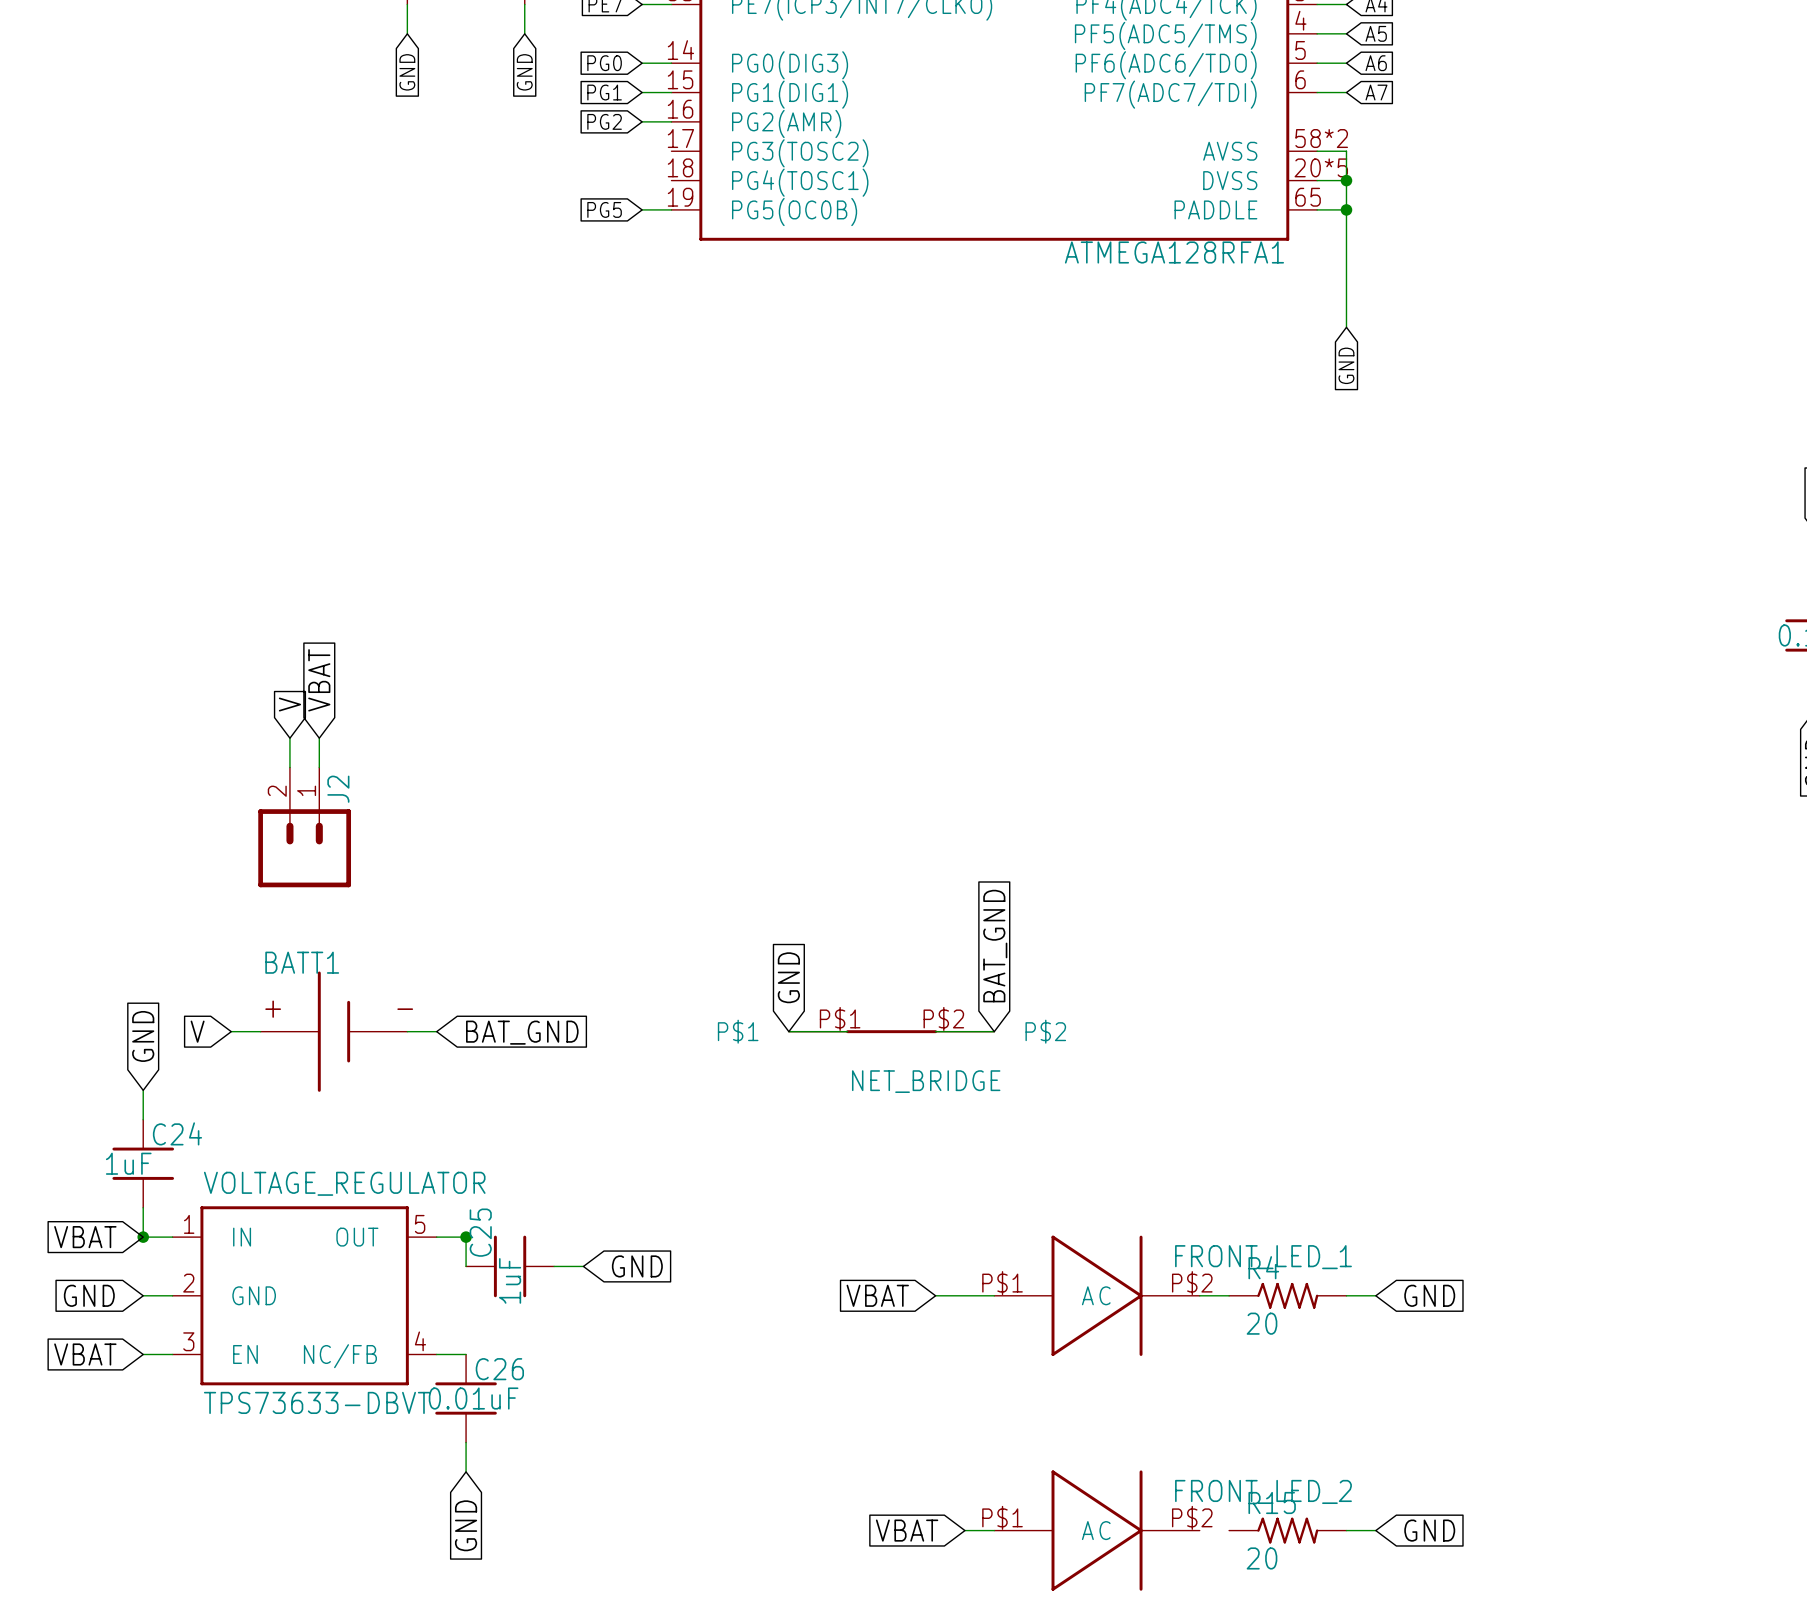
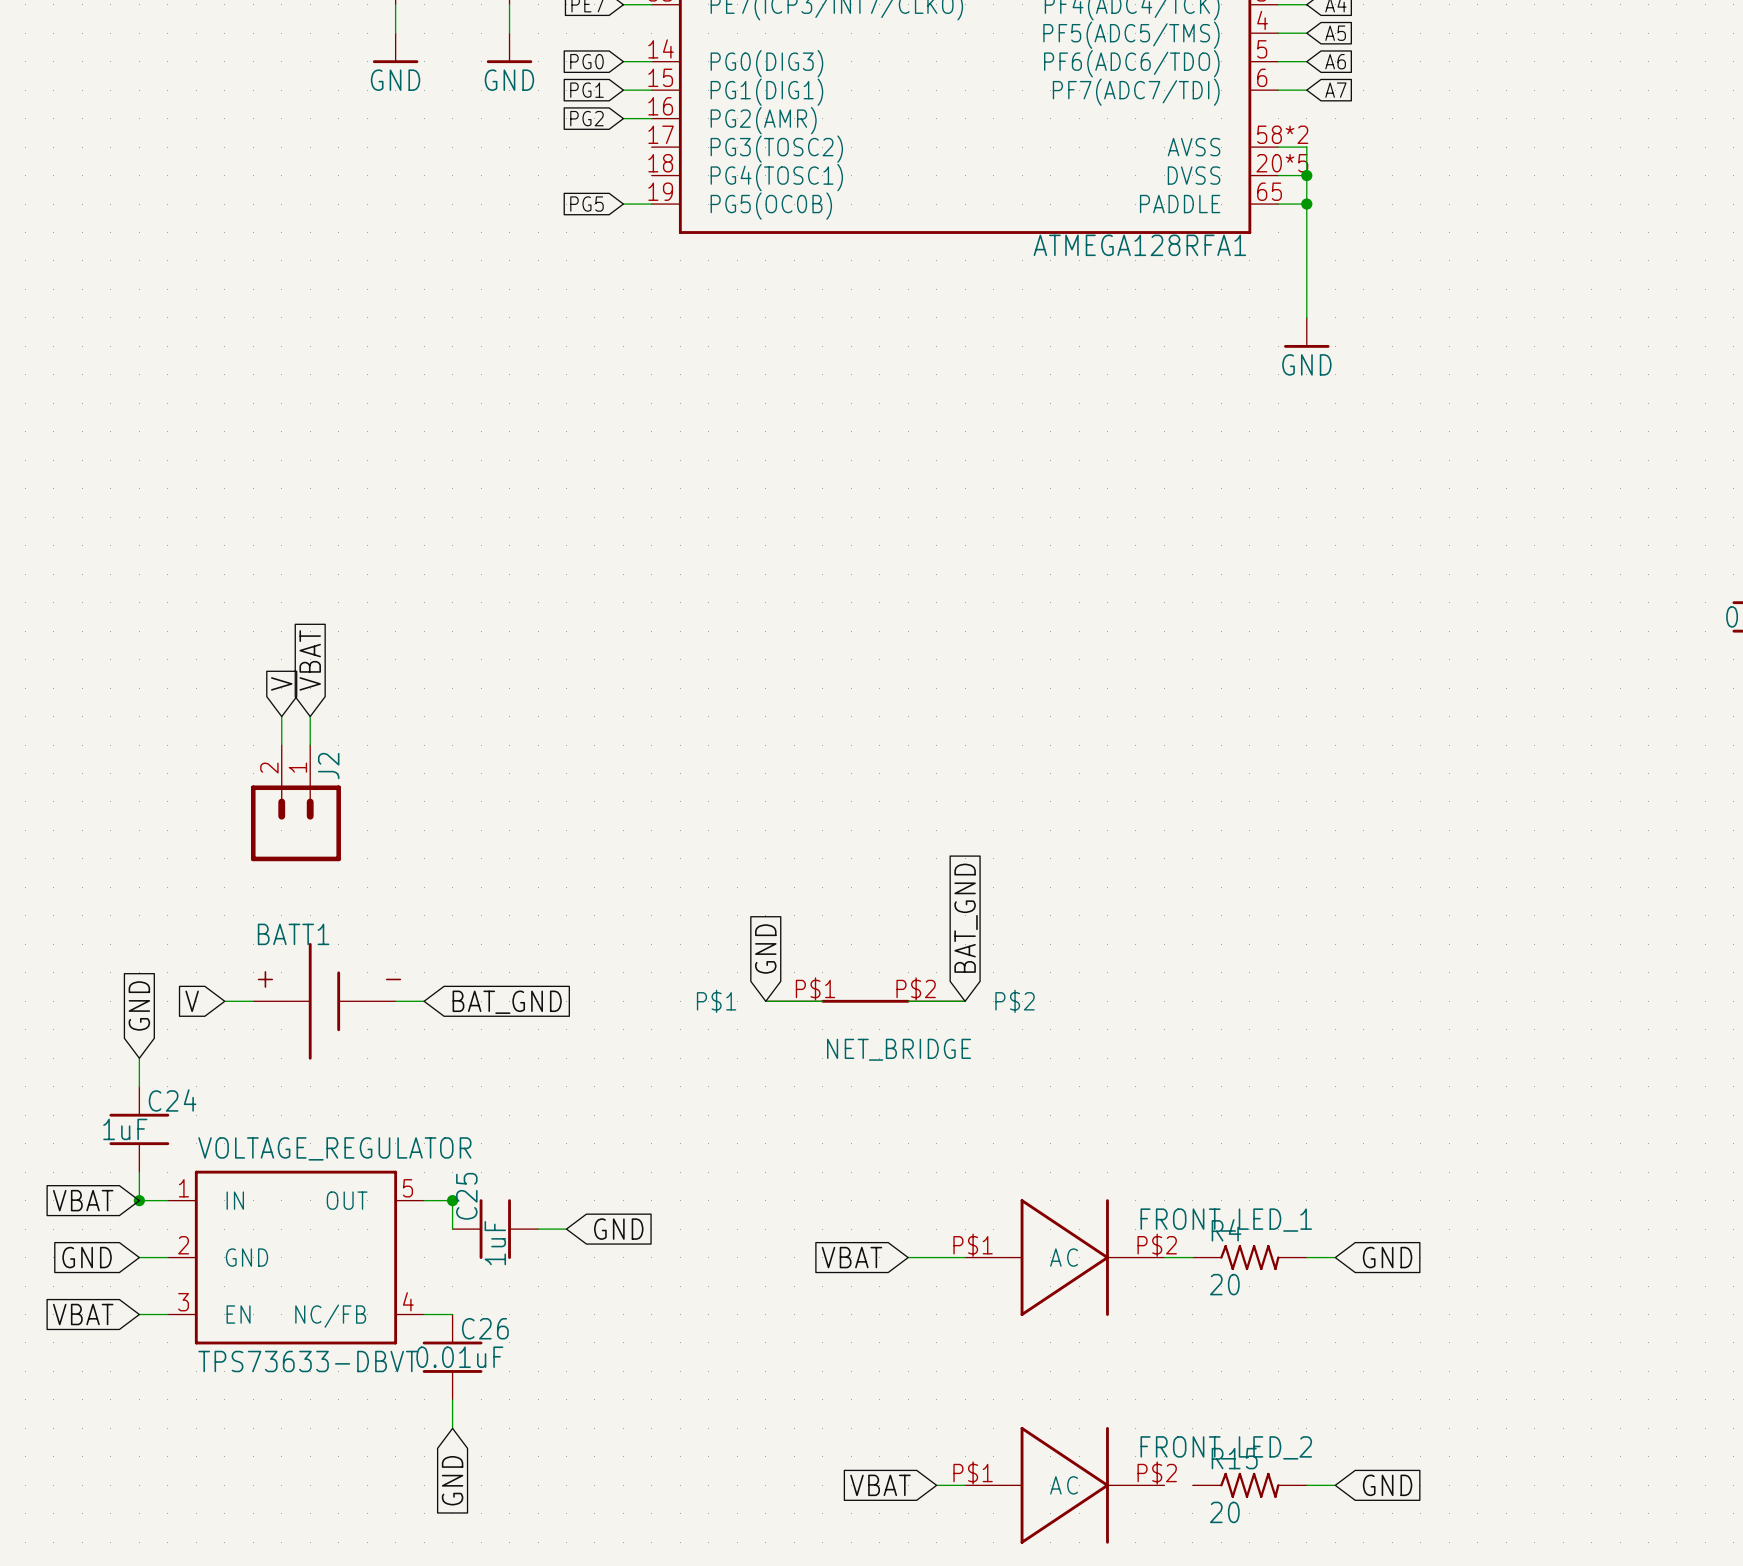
power symbol: none -> GND (395, 48)
power symbol: none -> GND (509, 48)
global label: GND (407, 72) -> none
global label: GND (524, 72) -> none
power symbol: none -> GND (1306, 332)
global label: GND (1346, 365) -> none

